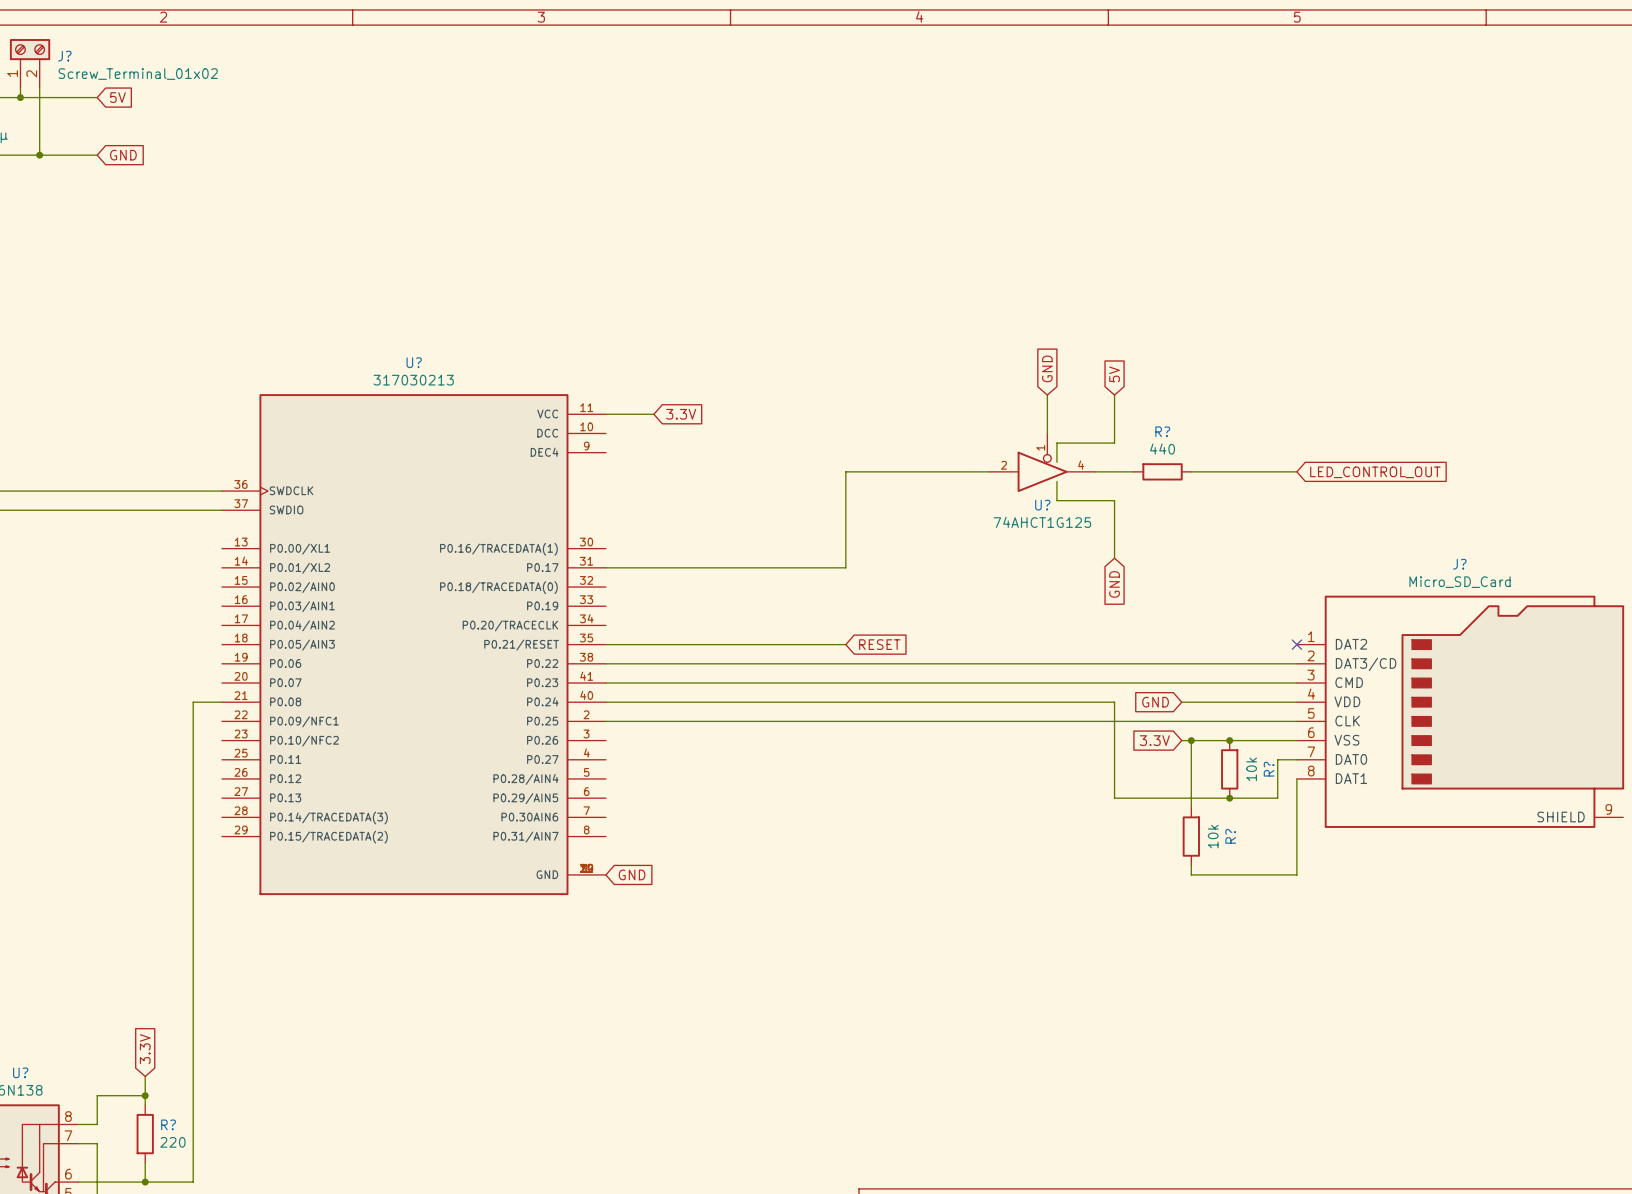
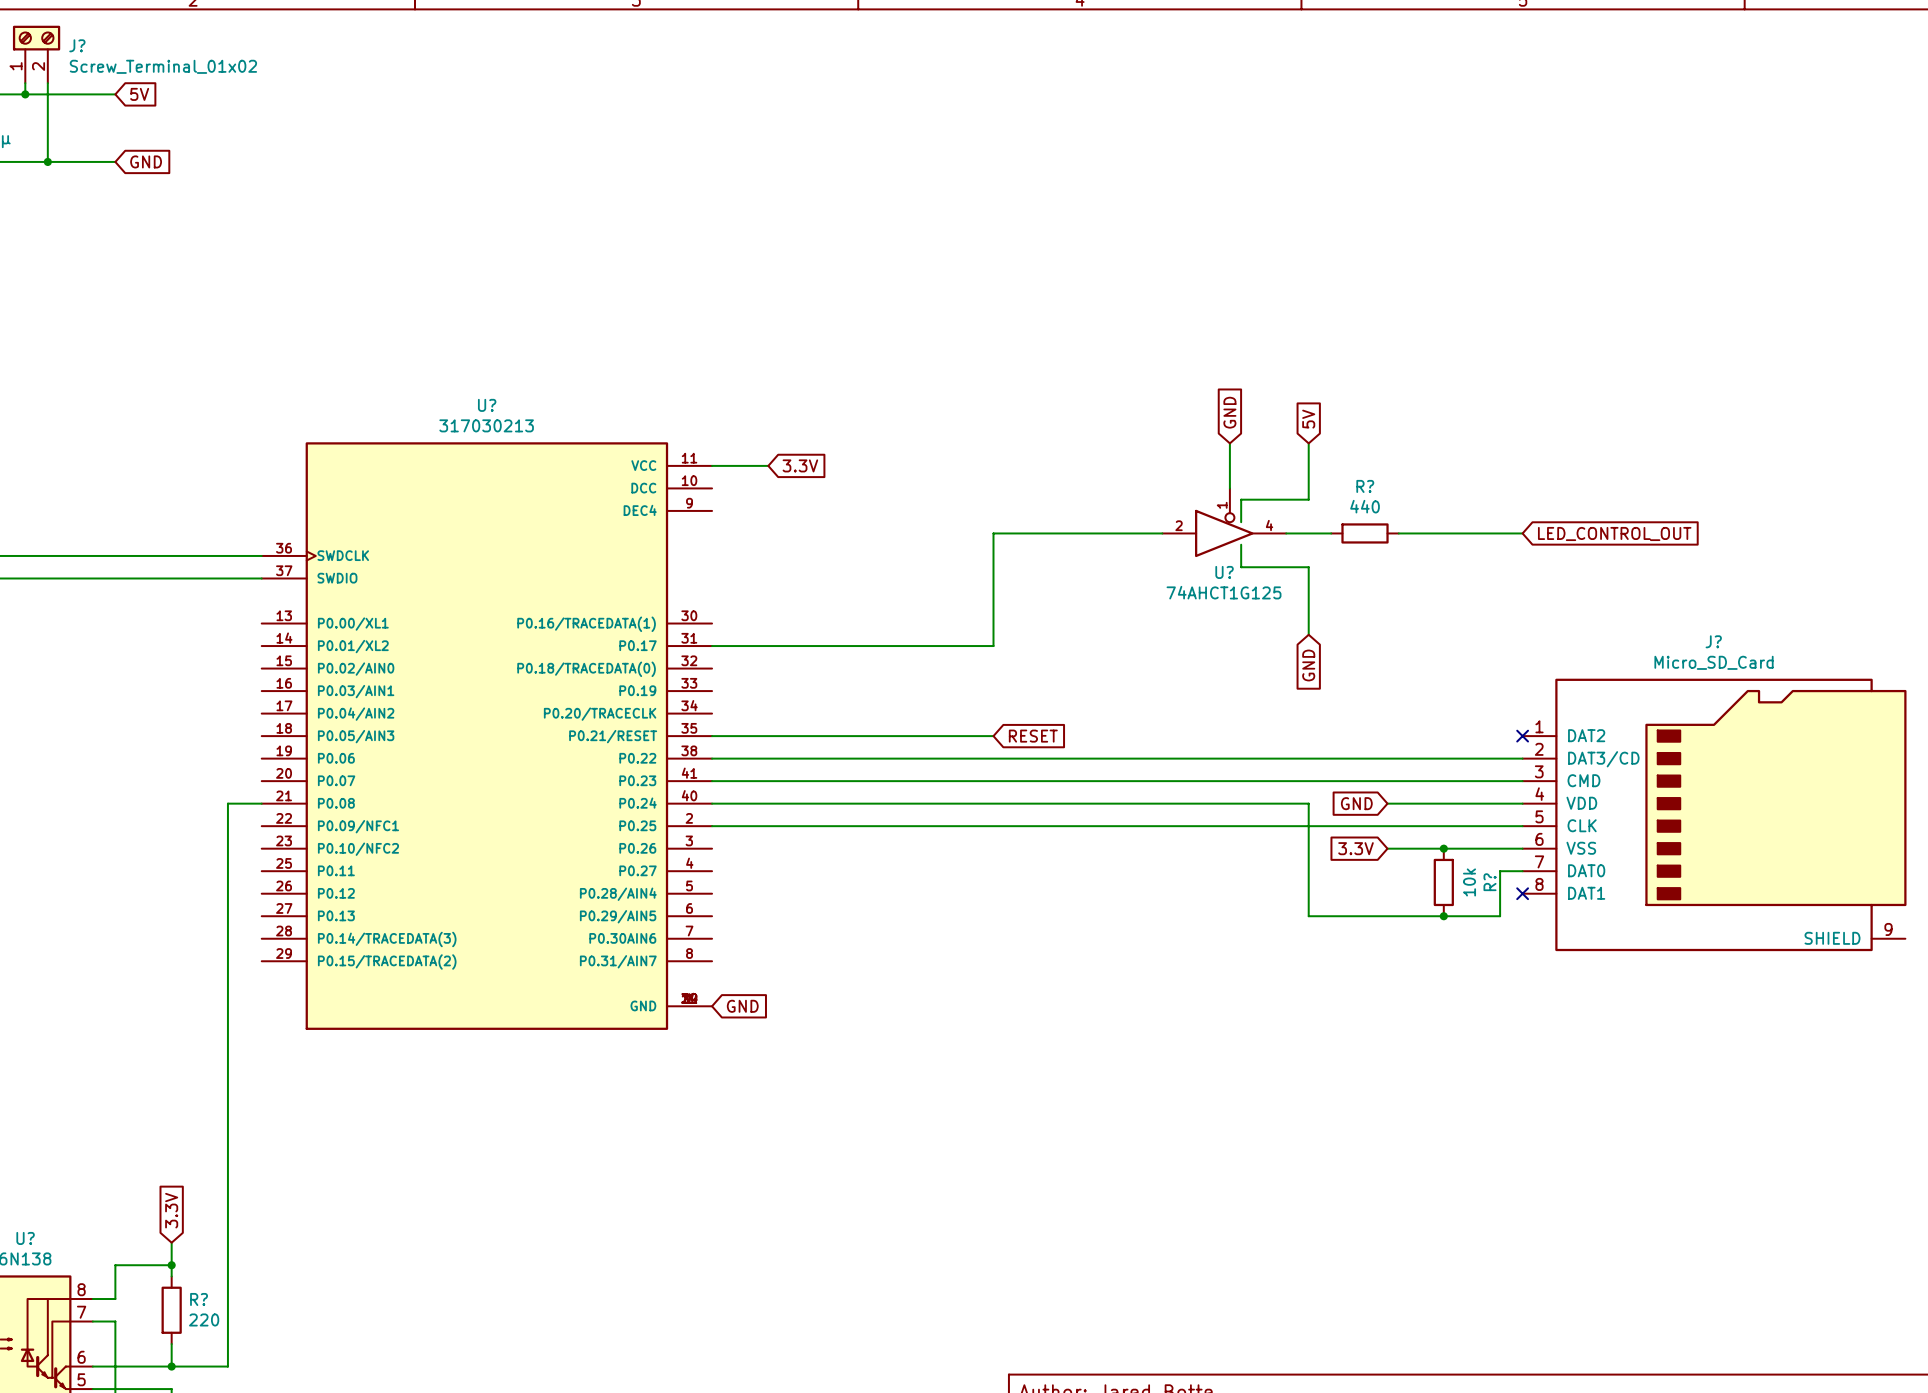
wire: (1191, 740) (1191, 807) -> none
junction: (1191, 740) -> none
wire: (1296, 778) (1296, 874) (1191, 874) (1191, 865) -> none
no-connect mark: none -> (1522, 893)
R?: 10k (1191, 836) -> none

